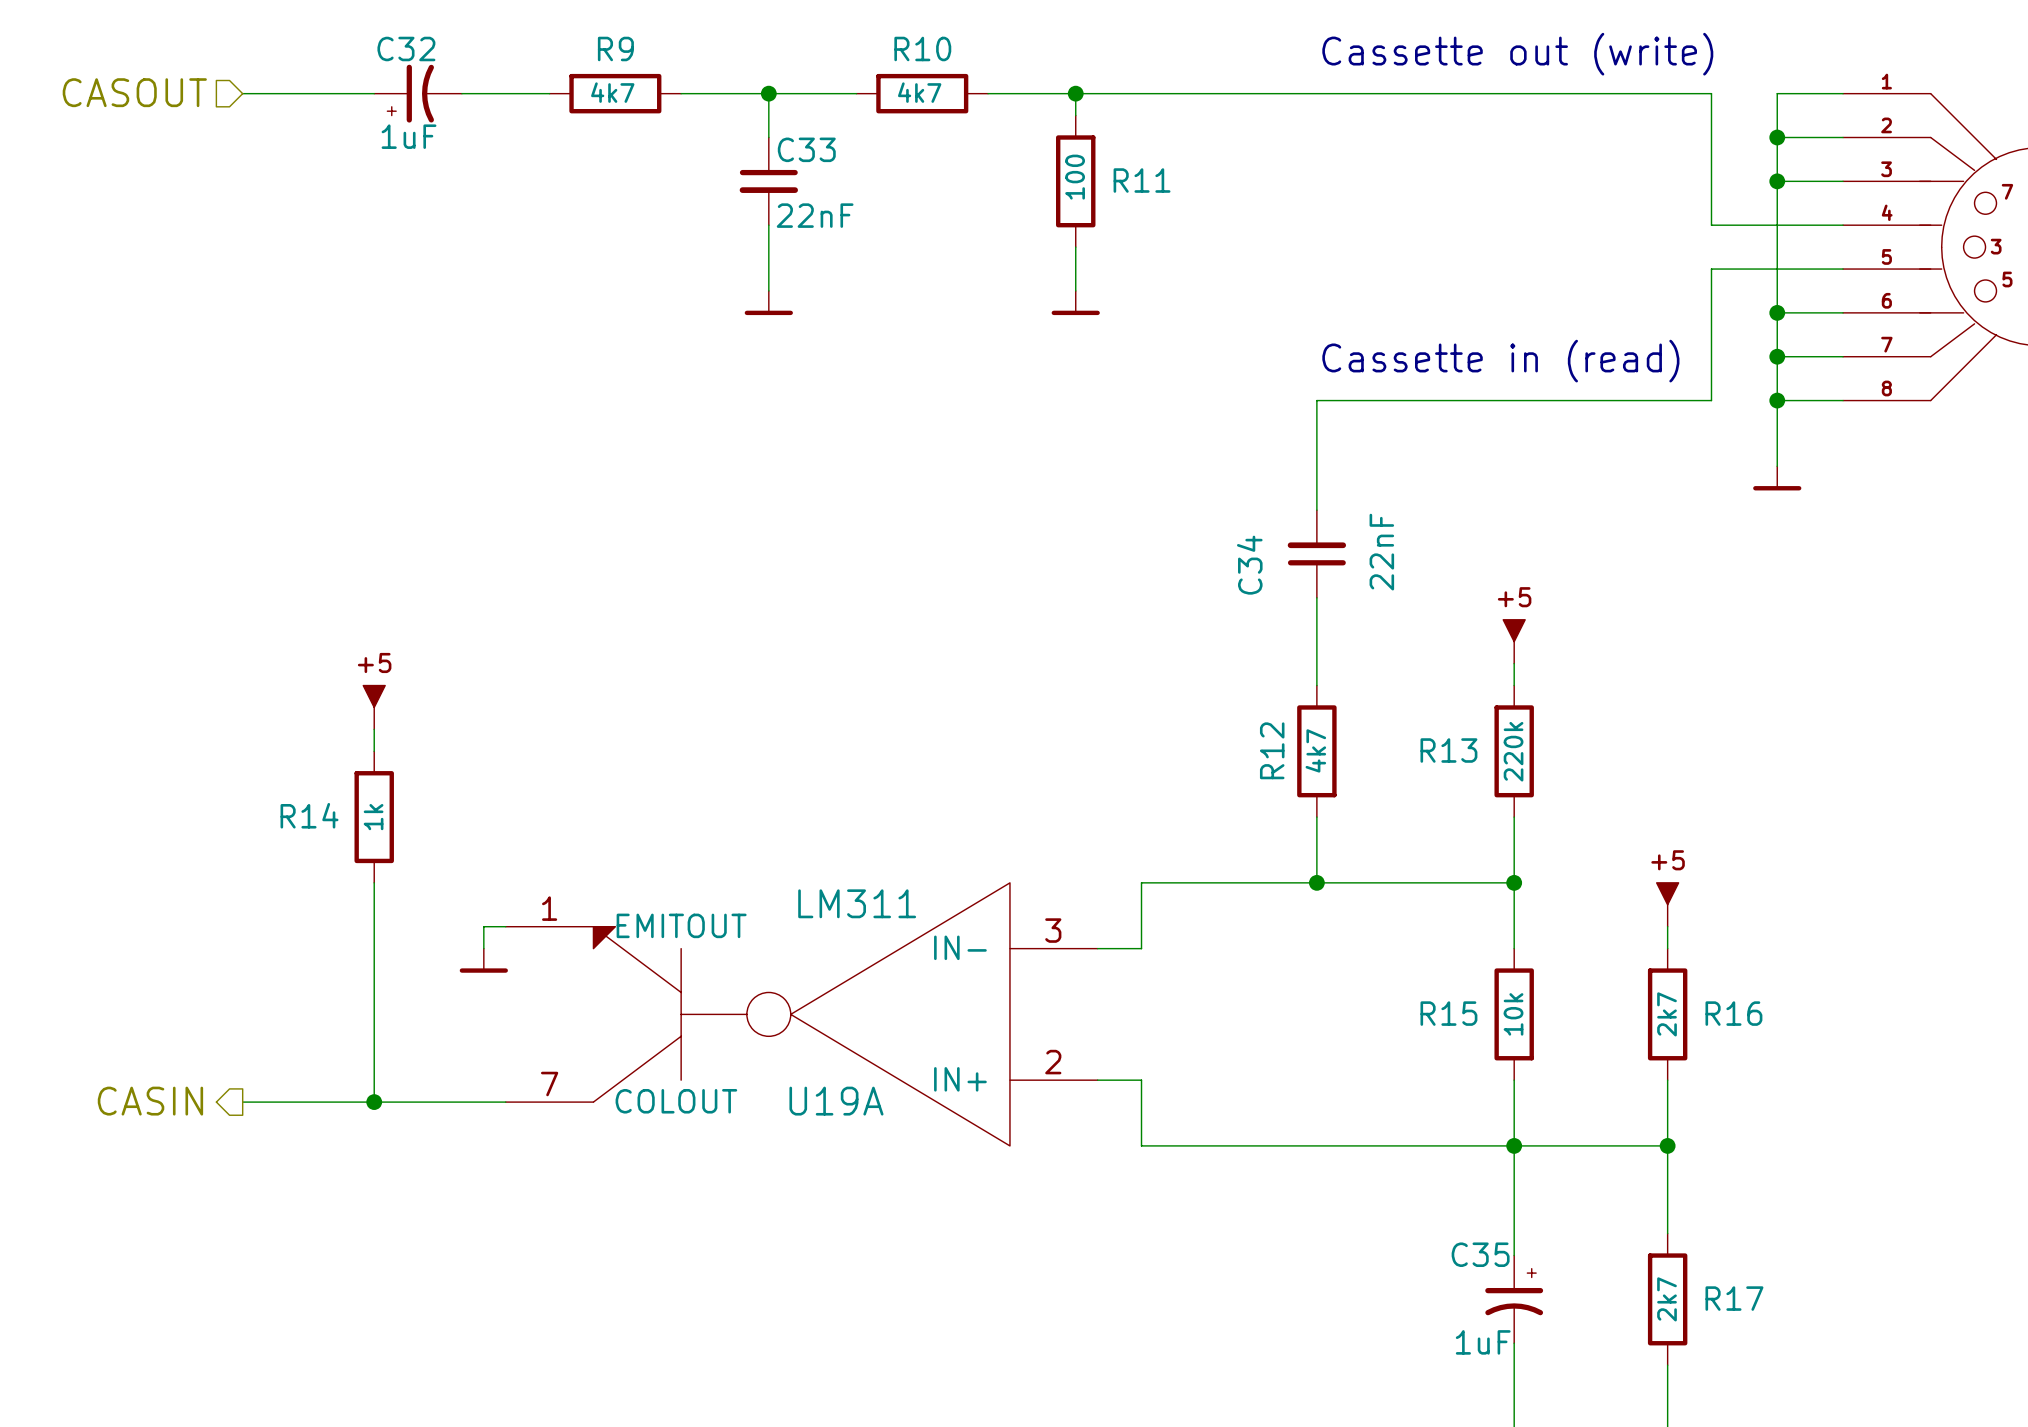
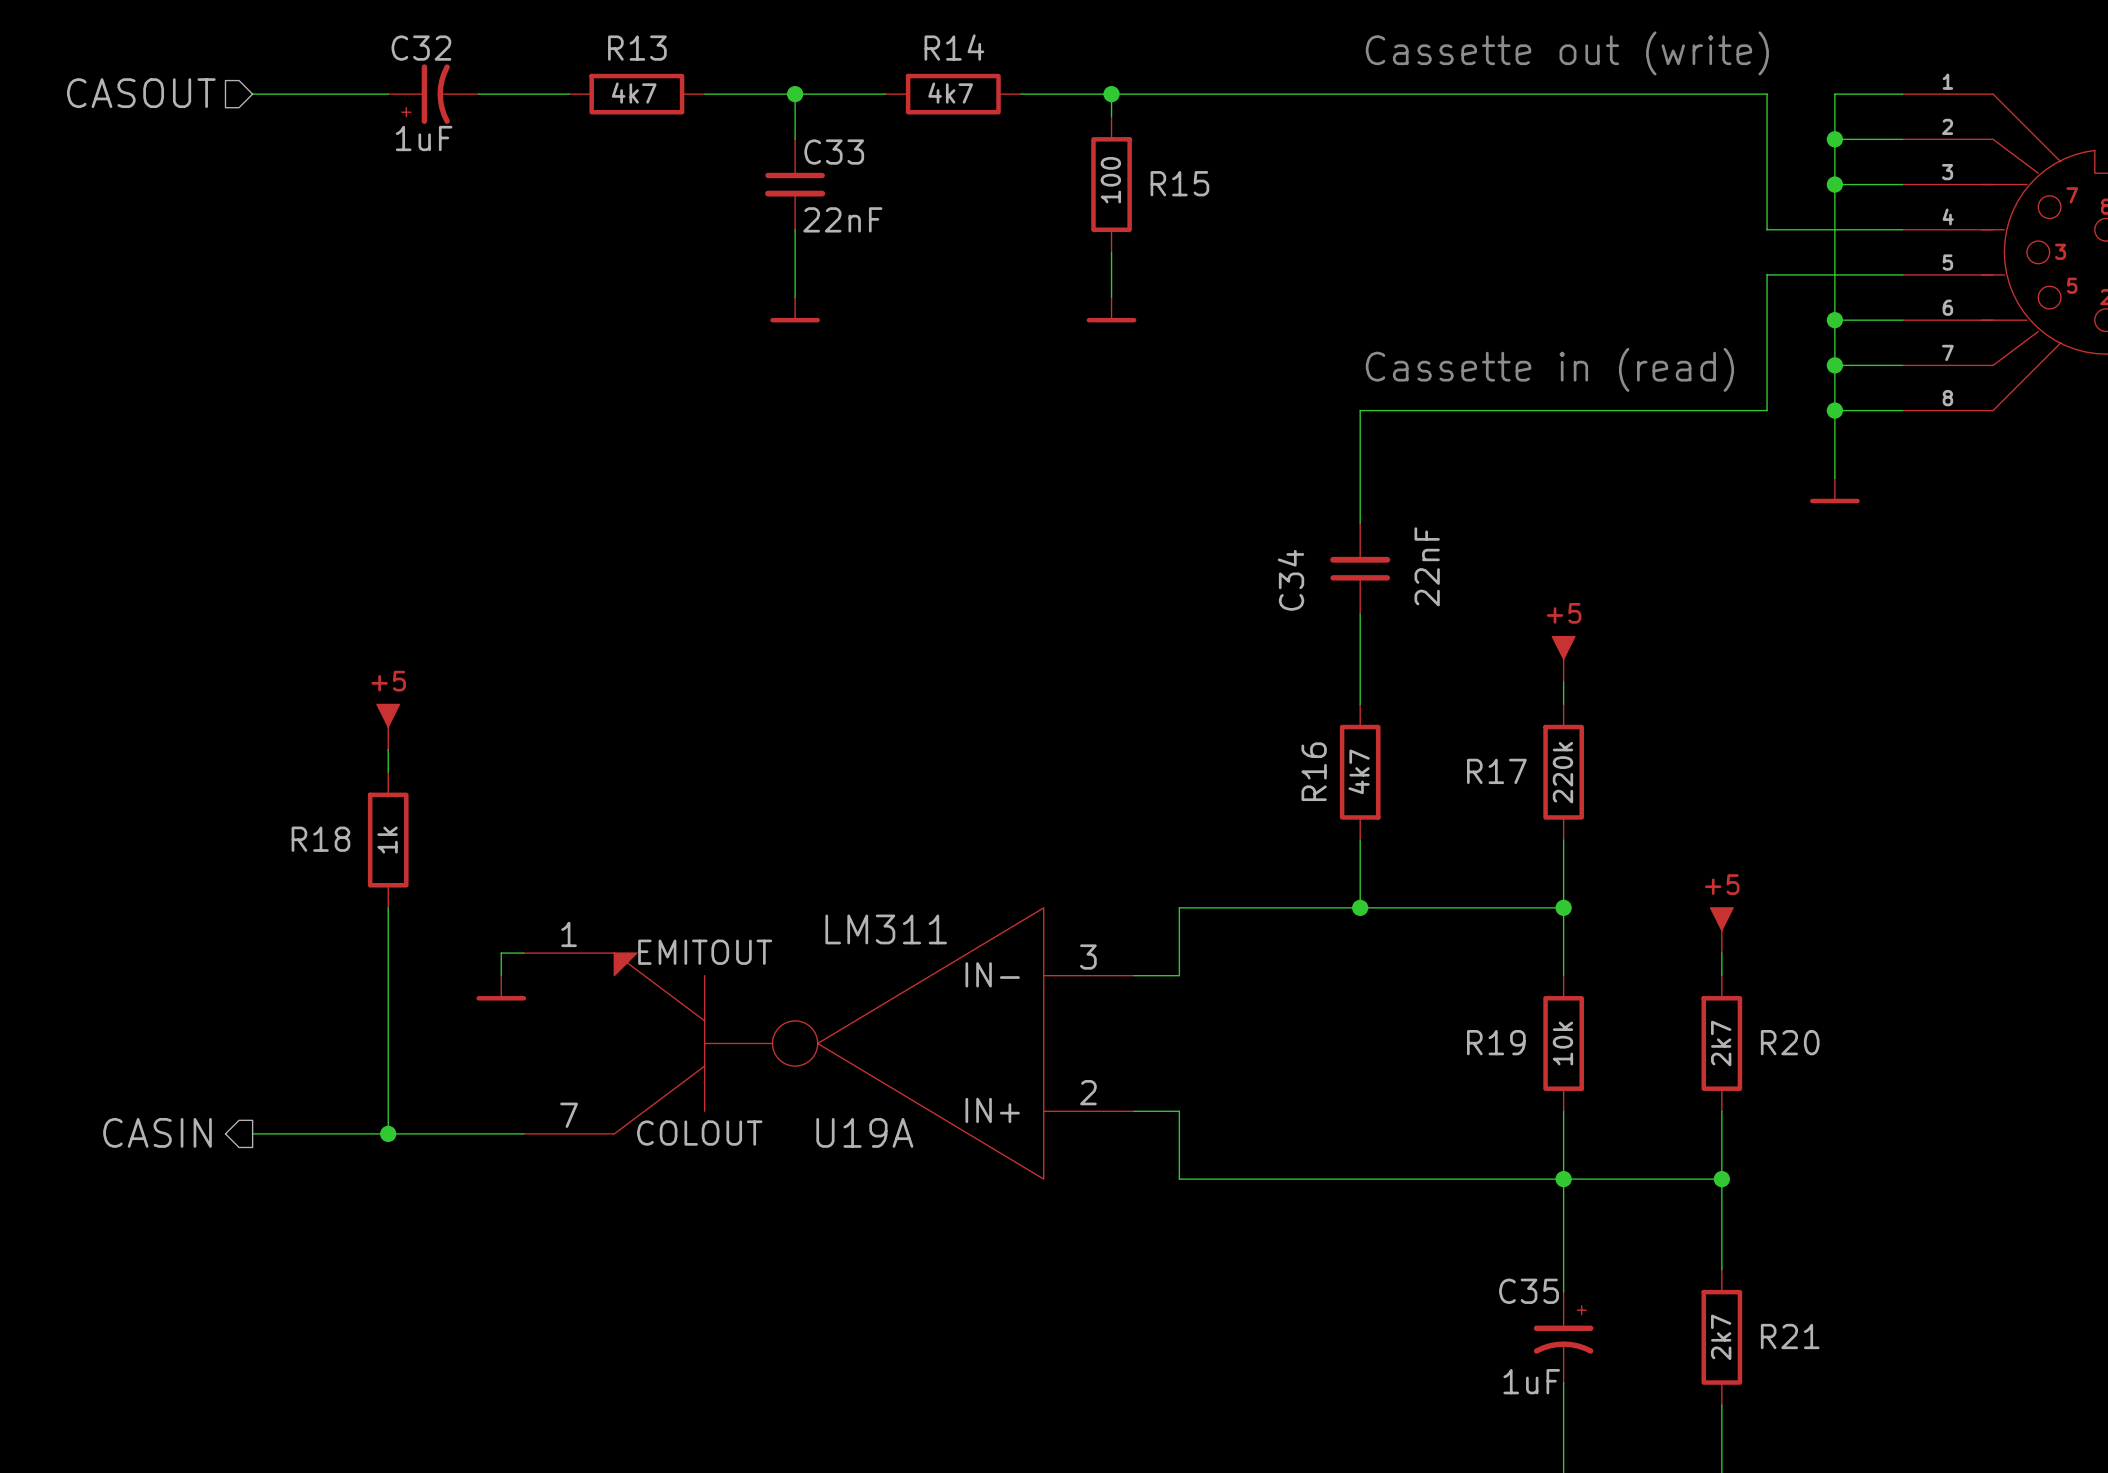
R9 name: R9 (615, 48) -> R13 (637, 48)
R10 name: R10 (922, 48) -> R14 (954, 47)
R11 name: R11 (1142, 180) -> R15 (1179, 183)
R12 name: R12 (1272, 750) -> R16 (1314, 771)
R13 name: R13 (1448, 750) -> R17 (1496, 771)
R14 name: R14 (309, 815) -> R18 (320, 839)
R15 name: R15 (1448, 1013) -> R19 (1496, 1042)
R16 name: R16 (1733, 1013) -> R20 (1790, 1042)
R17 name: R17 (1734, 1298) -> R21 (1790, 1336)

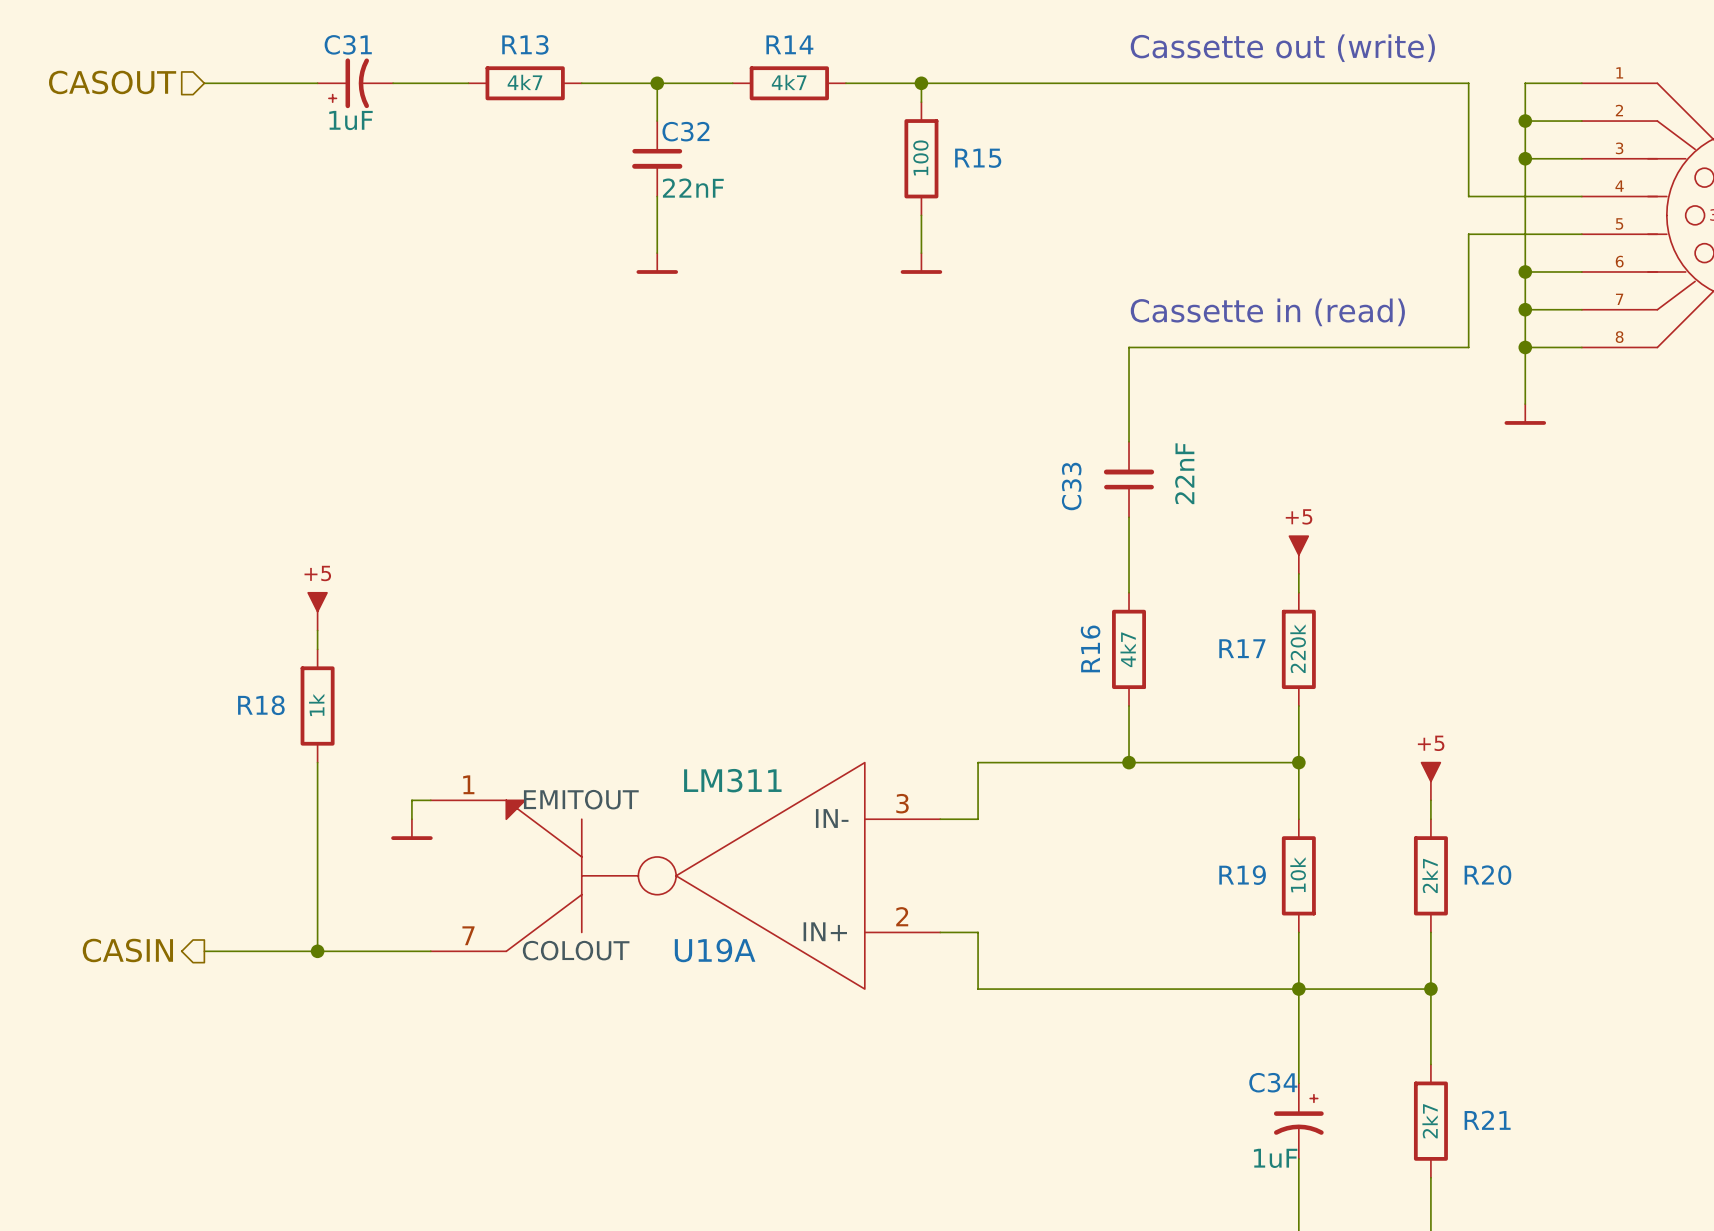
C32 name: C32 (421, 48) -> C31 (348, 44)
C33 name: C33 (834, 152) -> C32 (685, 131)
C34 name: C34 (1291, 580) -> C33 (1071, 486)
C35 name: C35 (1529, 1291) -> C34 (1273, 1082)

